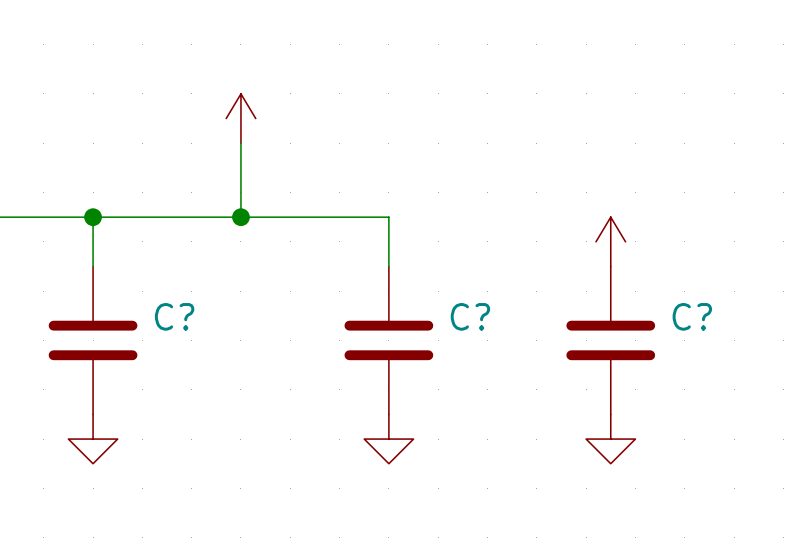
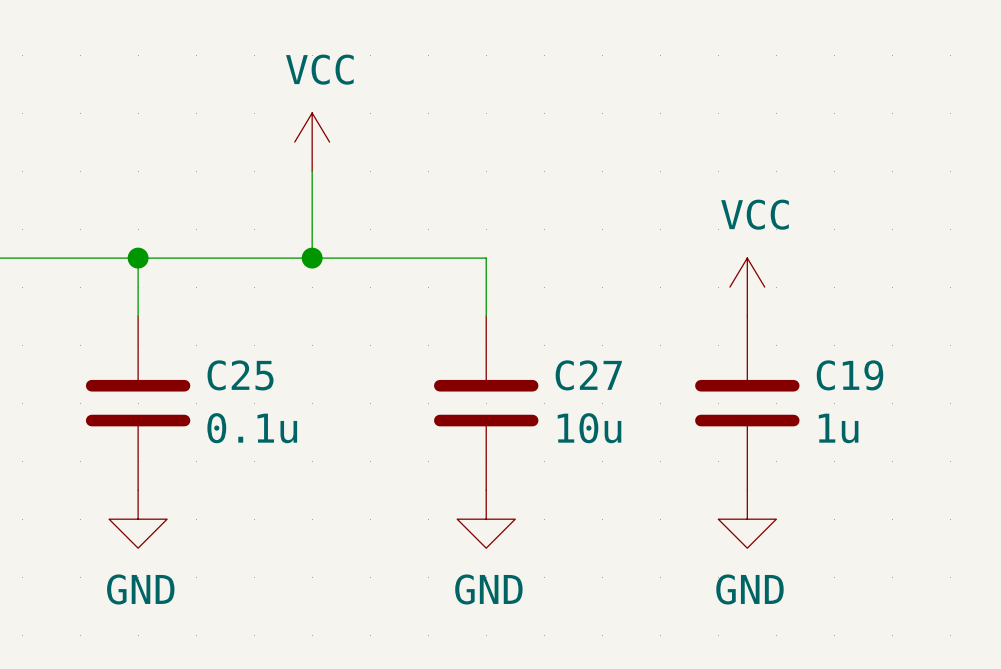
power symbol text: none -> VCC (319, 69)
power symbol text: none -> VCC (755, 214)
C? name: C? (174, 316) -> C25 (240, 375)
C? name: C? (470, 316) -> C27 (588, 375)
C? name: C? (692, 316) -> C19 (849, 375)
C? value: none -> 0.1u (252, 428)
C? value: none -> 10u (589, 428)
C? value: none -> 1u (838, 428)
power symbol text: none -> GND (140, 589)
power symbol text: none -> GND (488, 589)
power symbol text: none -> GND (749, 589)

